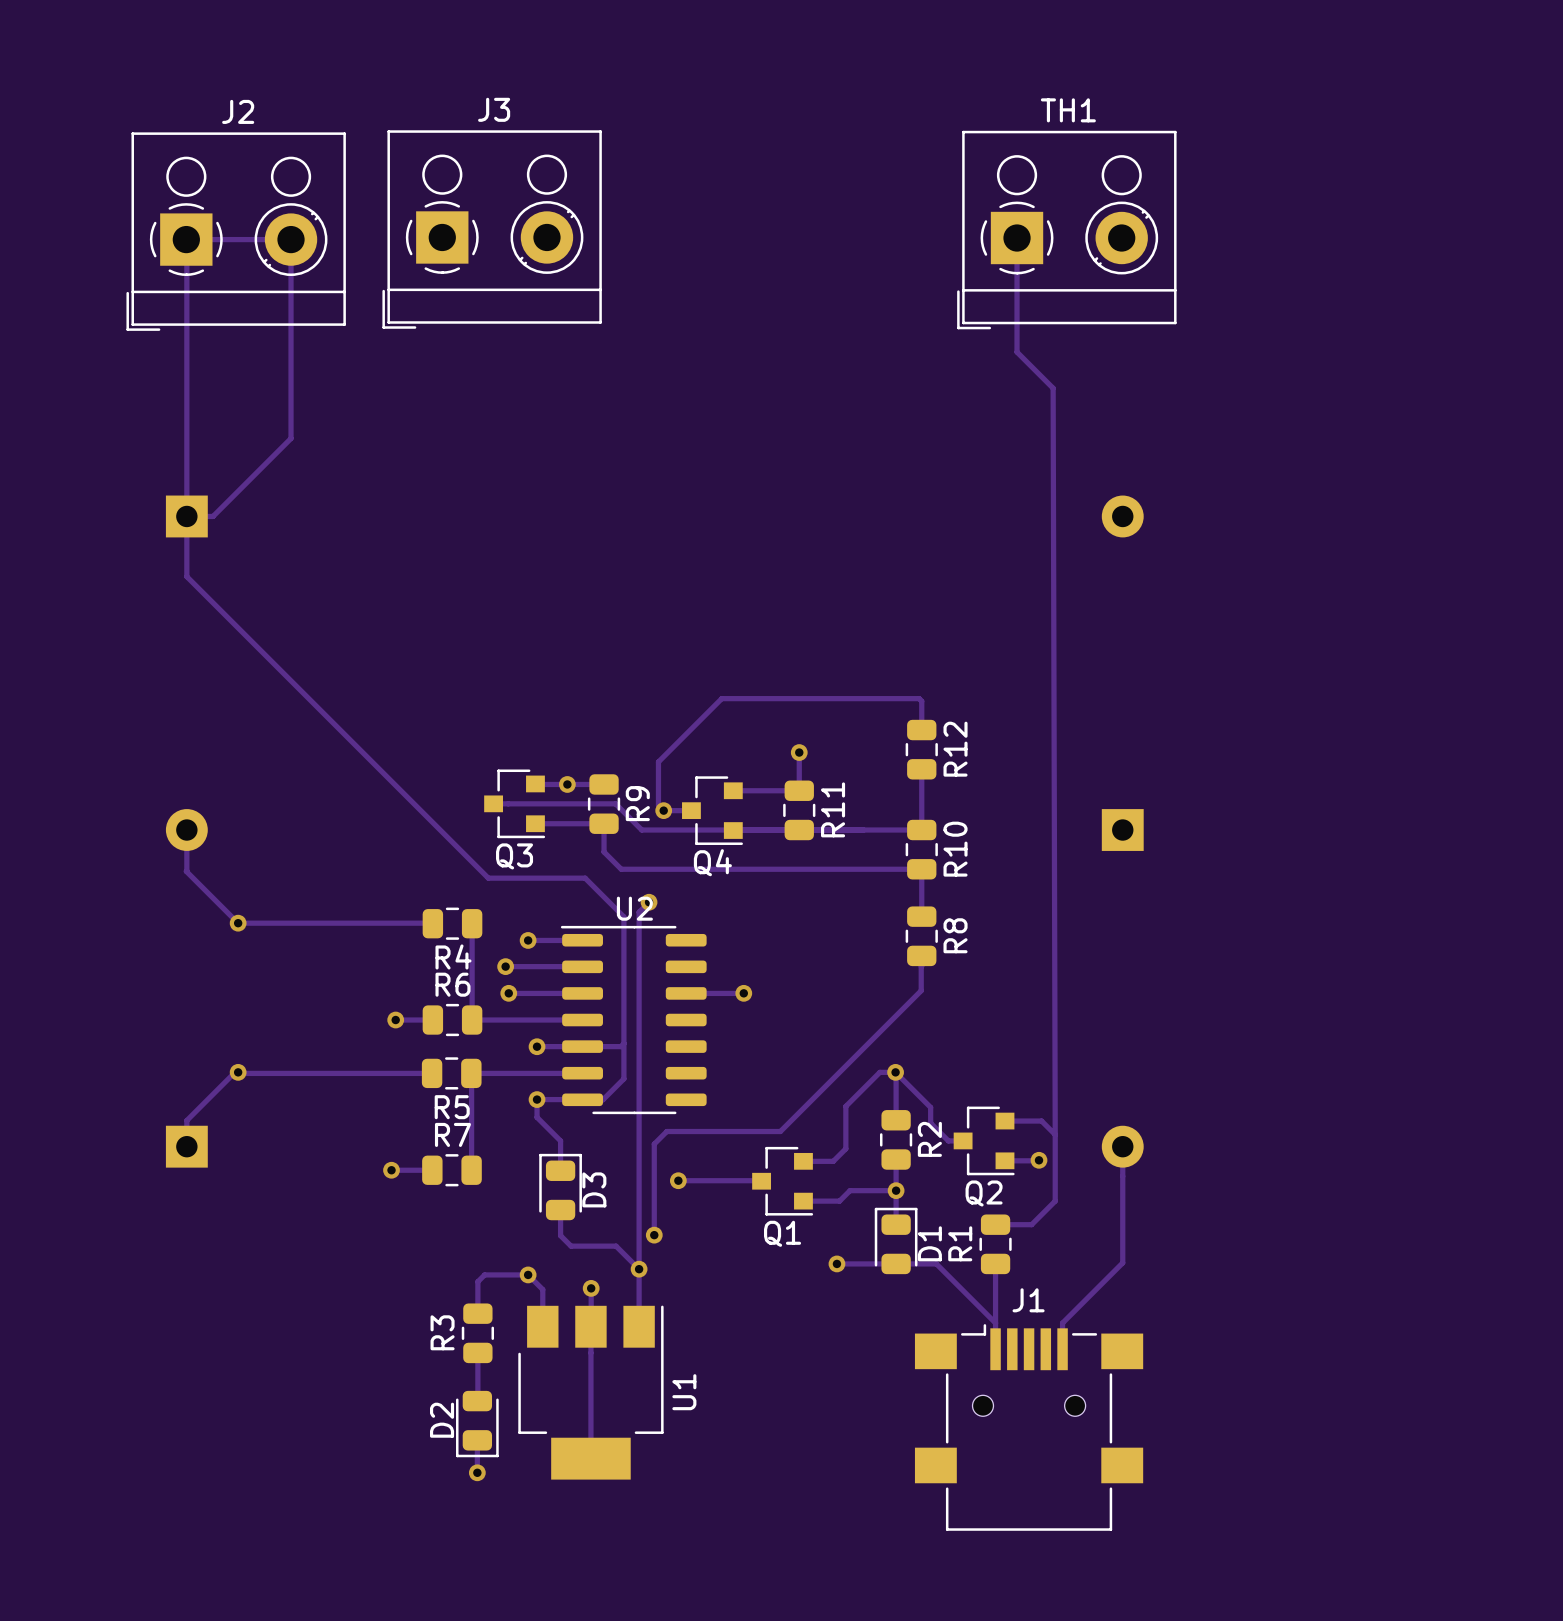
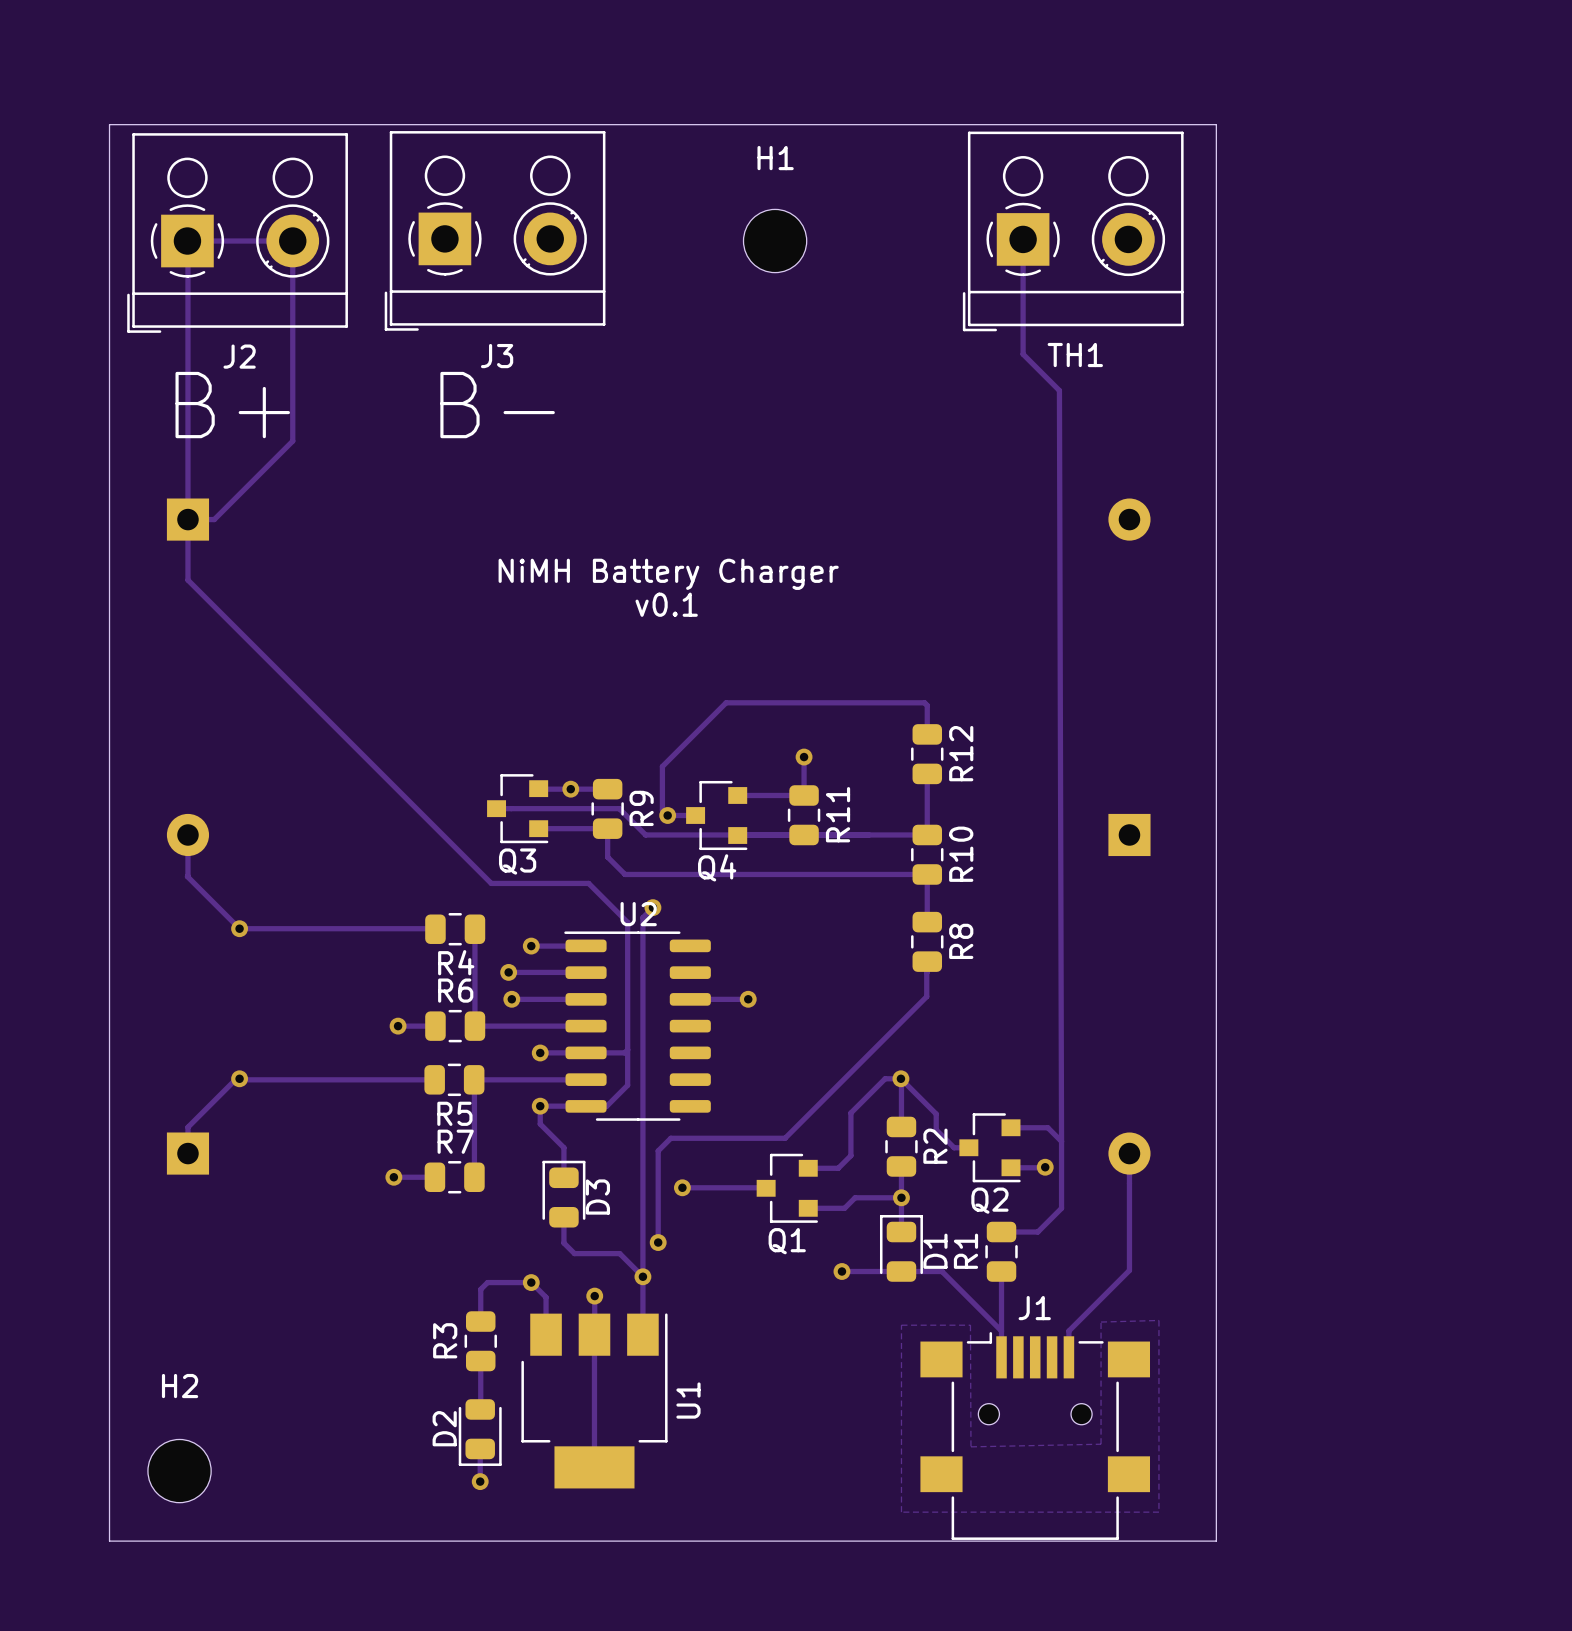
J3 name position: J3 (494, 109) -> J3 (497, 356)
TH1 name position: TH1 (1068, 110) -> TH1 (1075, 355)
J2 name position: J2 (238, 111) -> J2 (239, 356)
board edge: none -> (109, 124) (1216, 124) (1216, 1541) (109, 1541) (109, 124)
H1: none -> (775, 241)
text: none -> B+ (232, 405)
text: none -> B- (497, 405)
text: none -> NiMH Battery Charger (668, 574)
text: none -> v0.1 (666, 604)
zone outline: none -> (1158, 1320) (1101, 1322) (1101, 1444) (970, 1446) (970, 1325) (901, 1325) (901, 1512) (1158, 1512) (1158, 1320)
H2: none -> (179, 1471)

